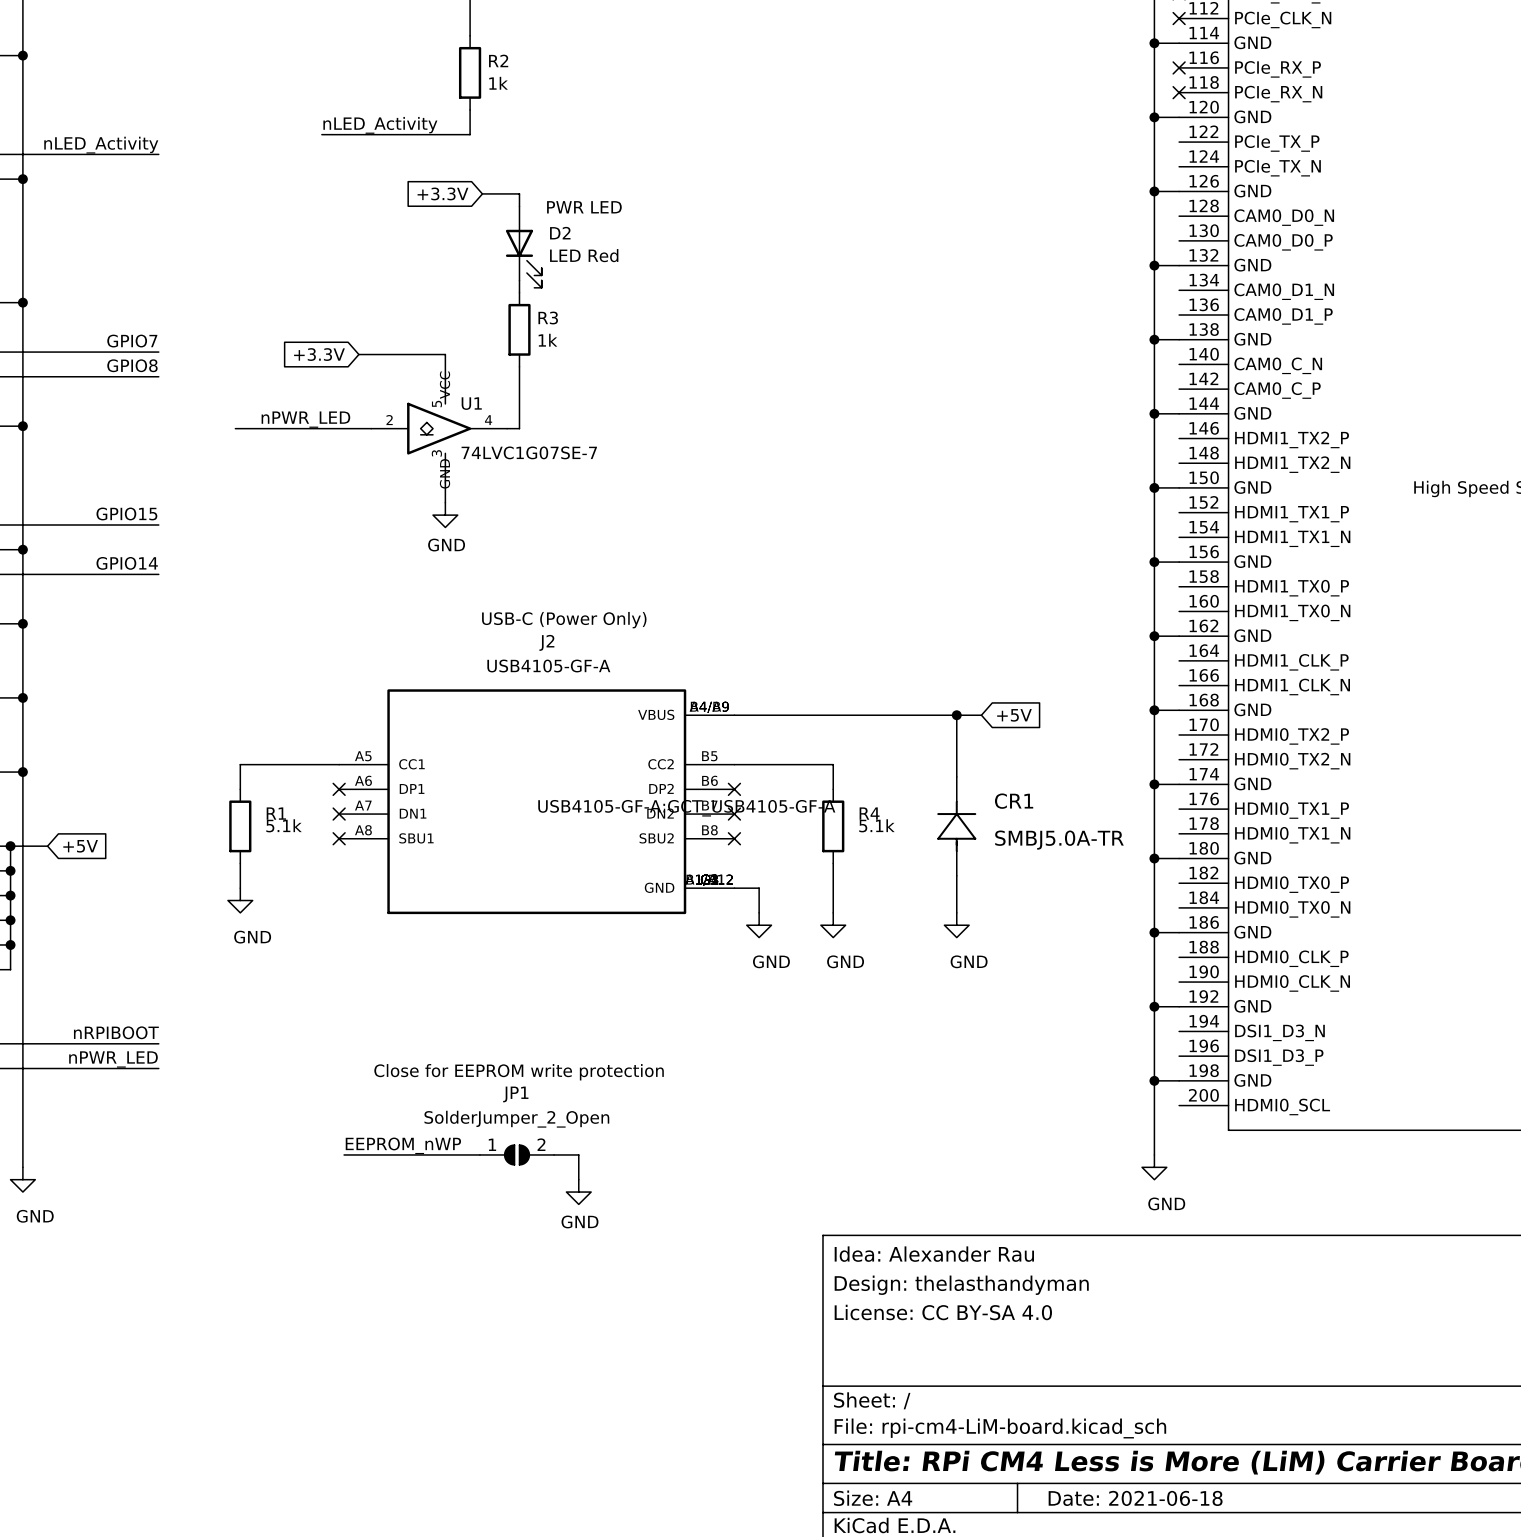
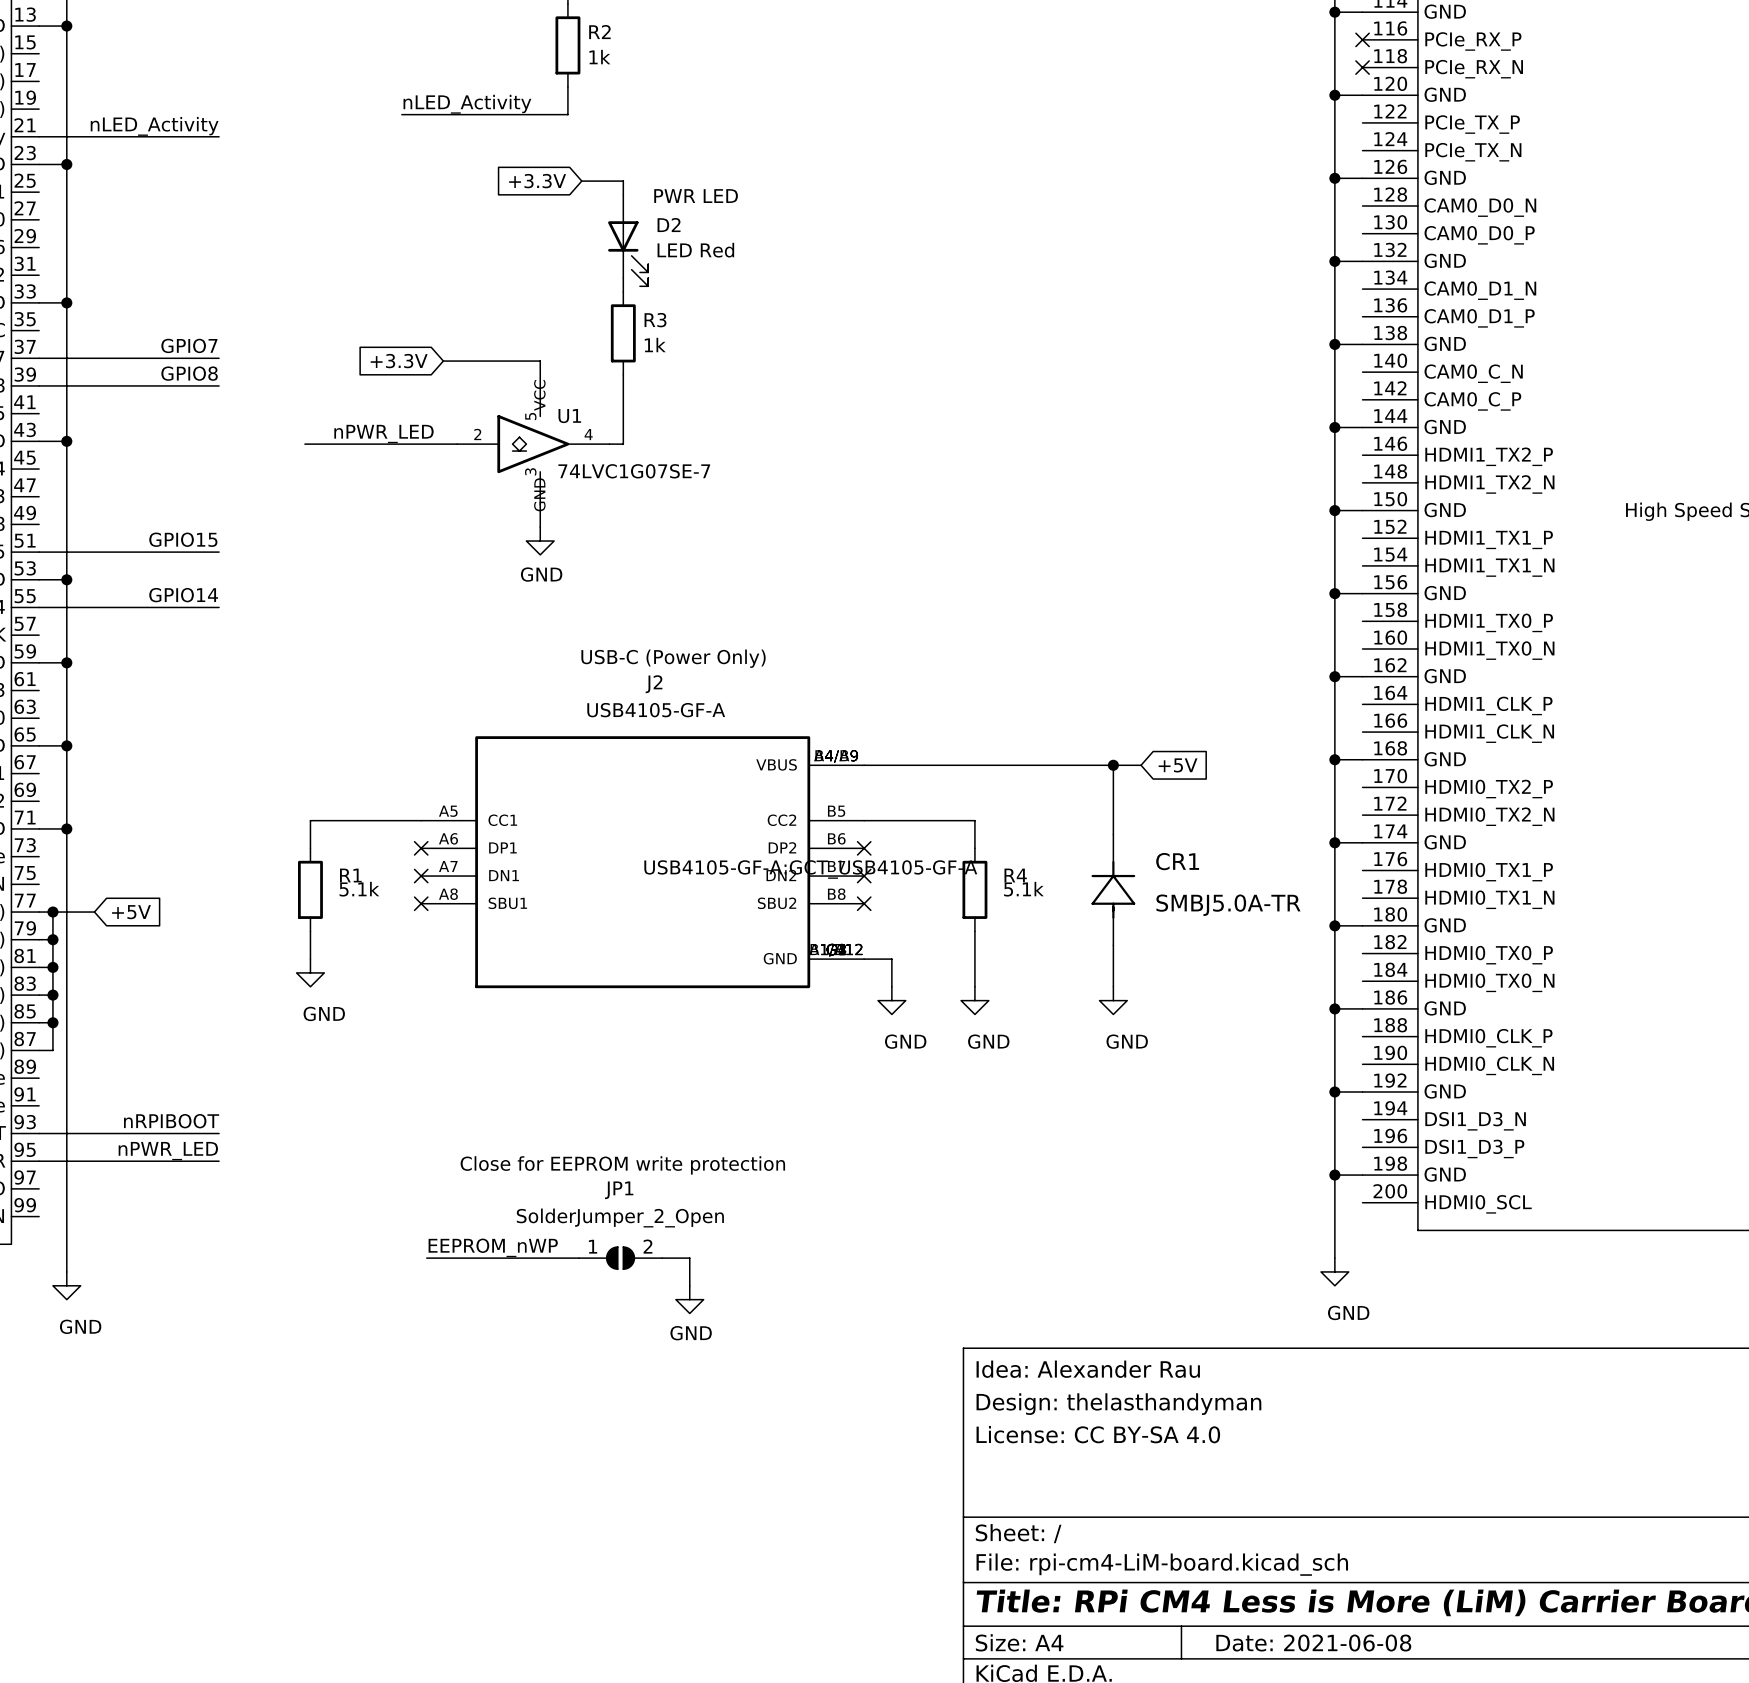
title block: Date: 2021-06-18 (1135, 1498) -> Date: 2021-06-08 (1313, 1643)

